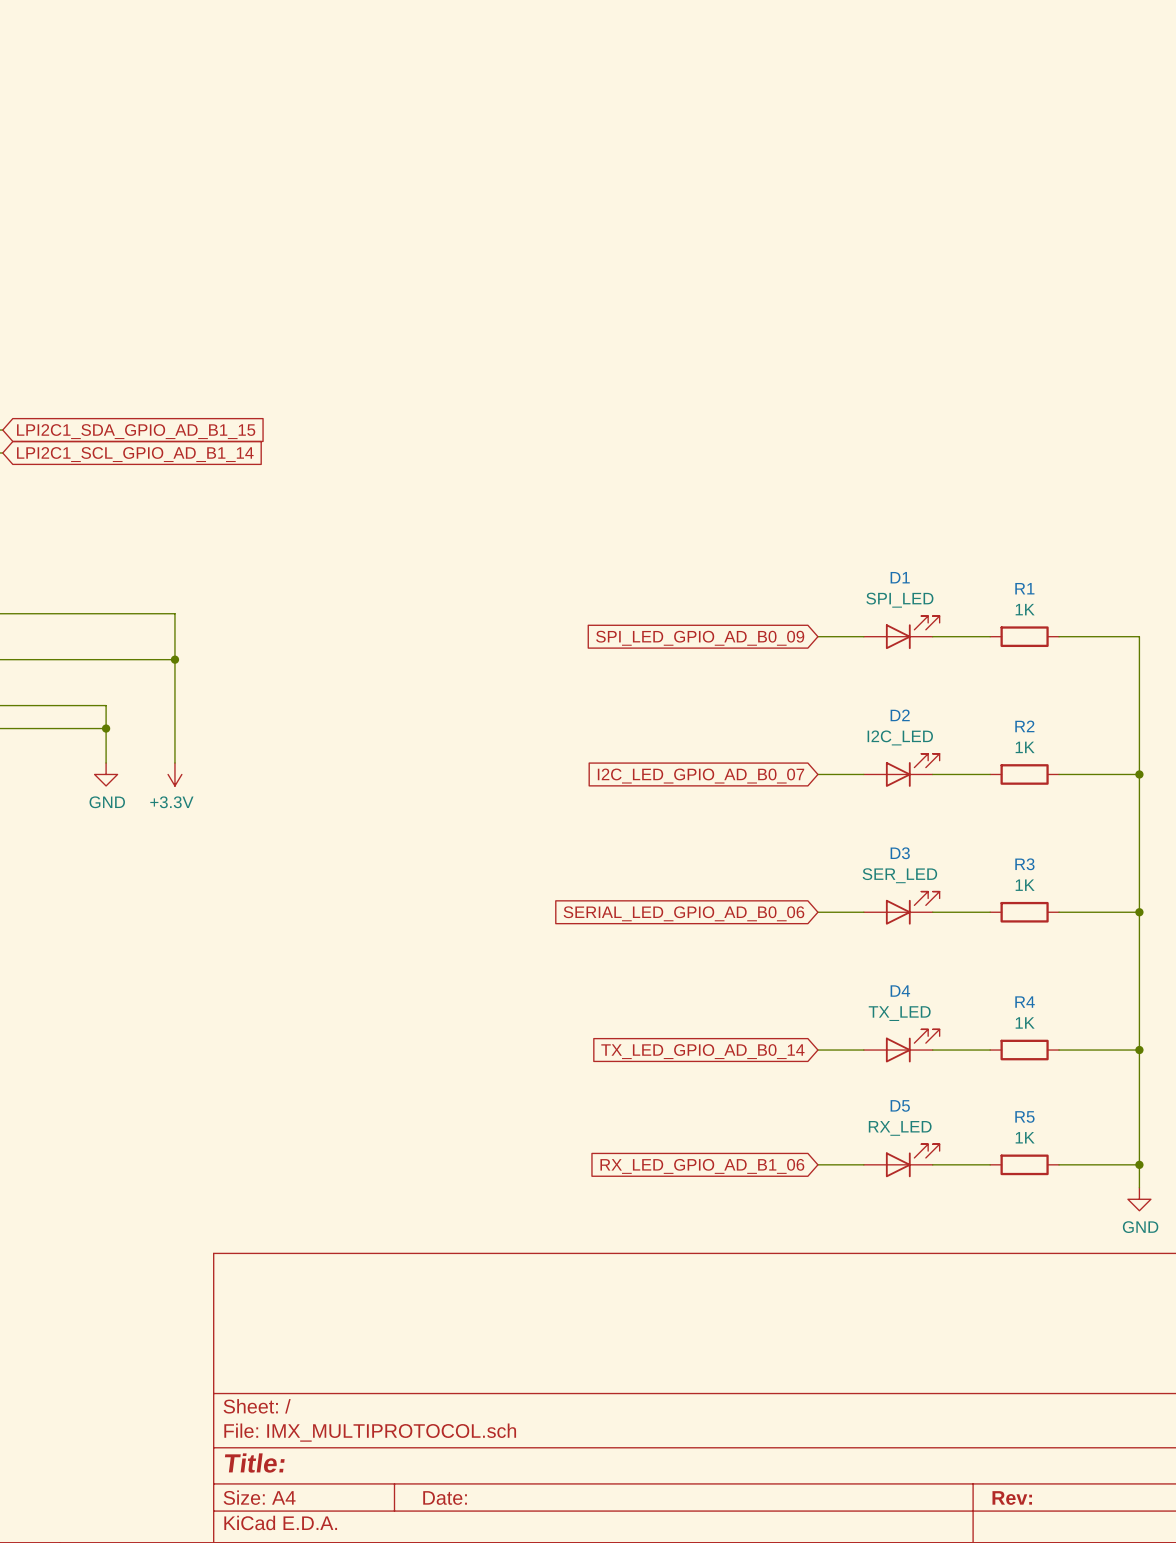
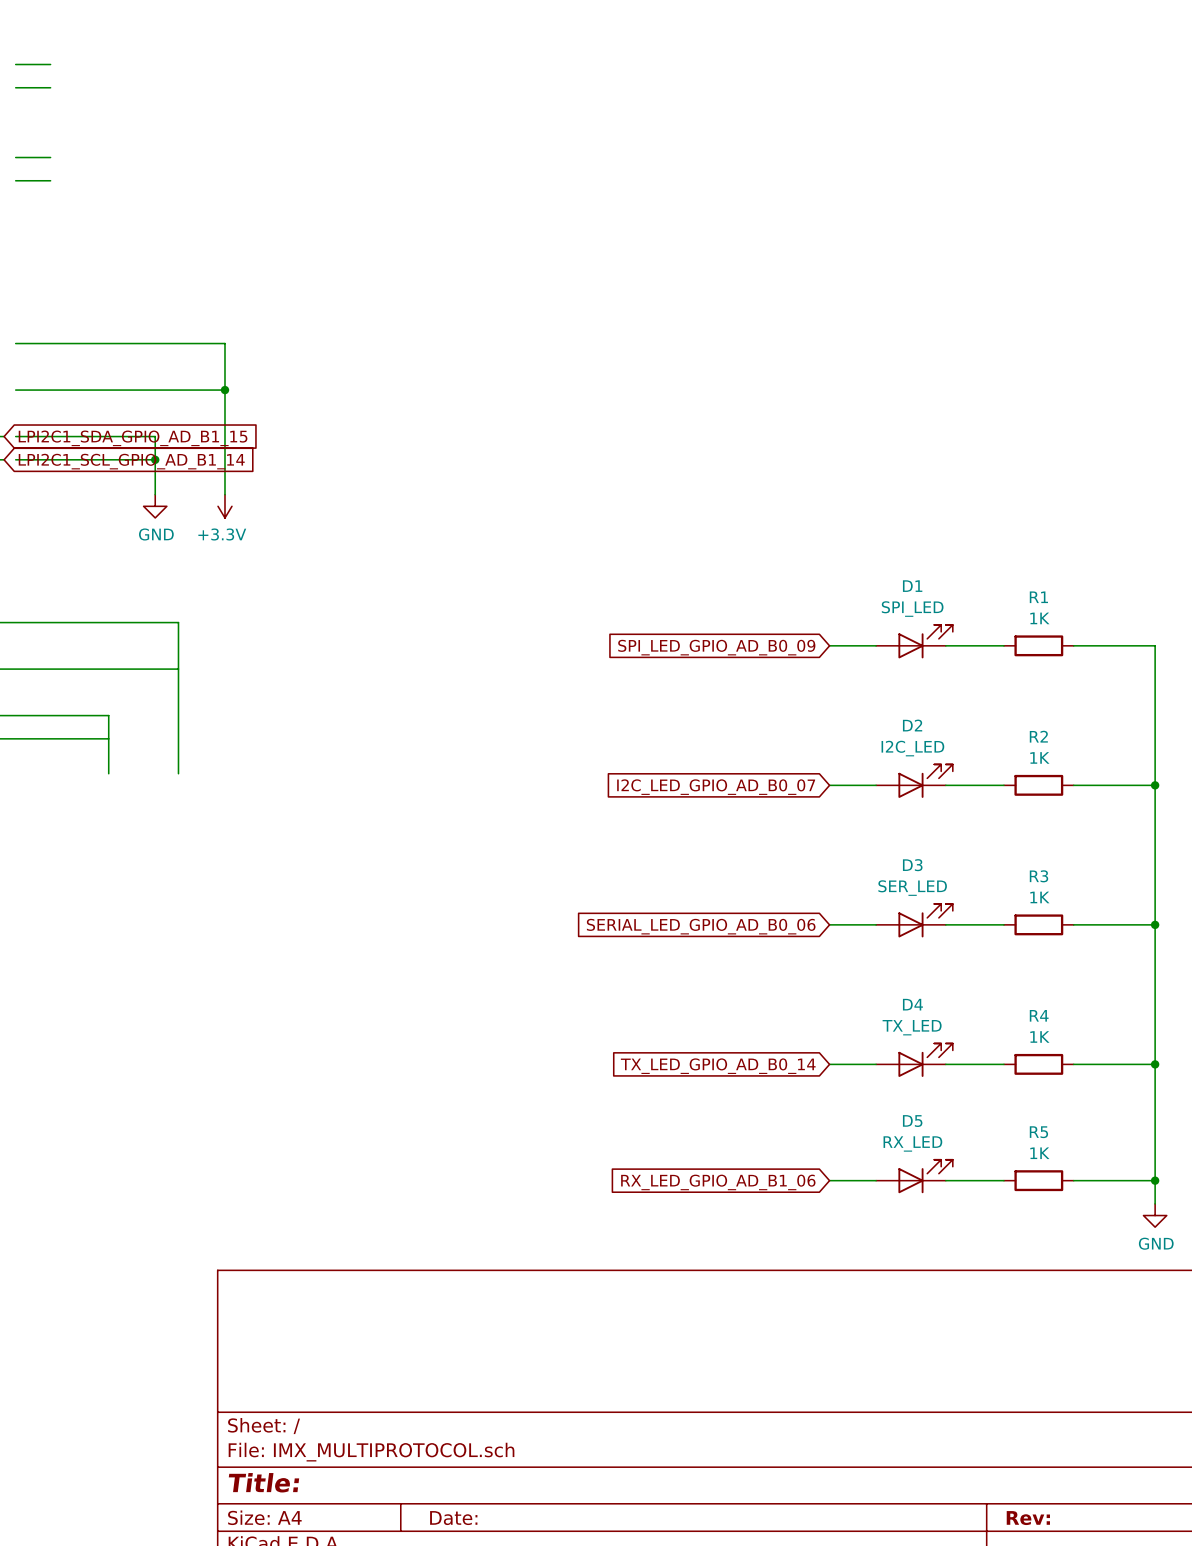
wire: none -> (15, 64) (50, 64)
wire: none -> (15, 87) (50, 87)
wire: none -> (15, 157) (50, 157)
wire: none -> (15, 180) (50, 180)
wire: none -> (15, 343) (224, 343) (224, 494)
wire: none -> (15, 390) (224, 390)
junction: none -> (224, 390)
wire: none -> (15, 436) (155, 436) (155, 494)
wire: none -> (15, 459) (155, 459)
junction: none -> (155, 459)
power symbol: none -> GND (155, 506)
power symbol: none -> +3.3V (224, 506)
junction: (174, 659) -> none
junction: (106, 728) -> none
power symbol: GND (106, 774) -> none
power symbol: +3.3V (174, 774) -> none

